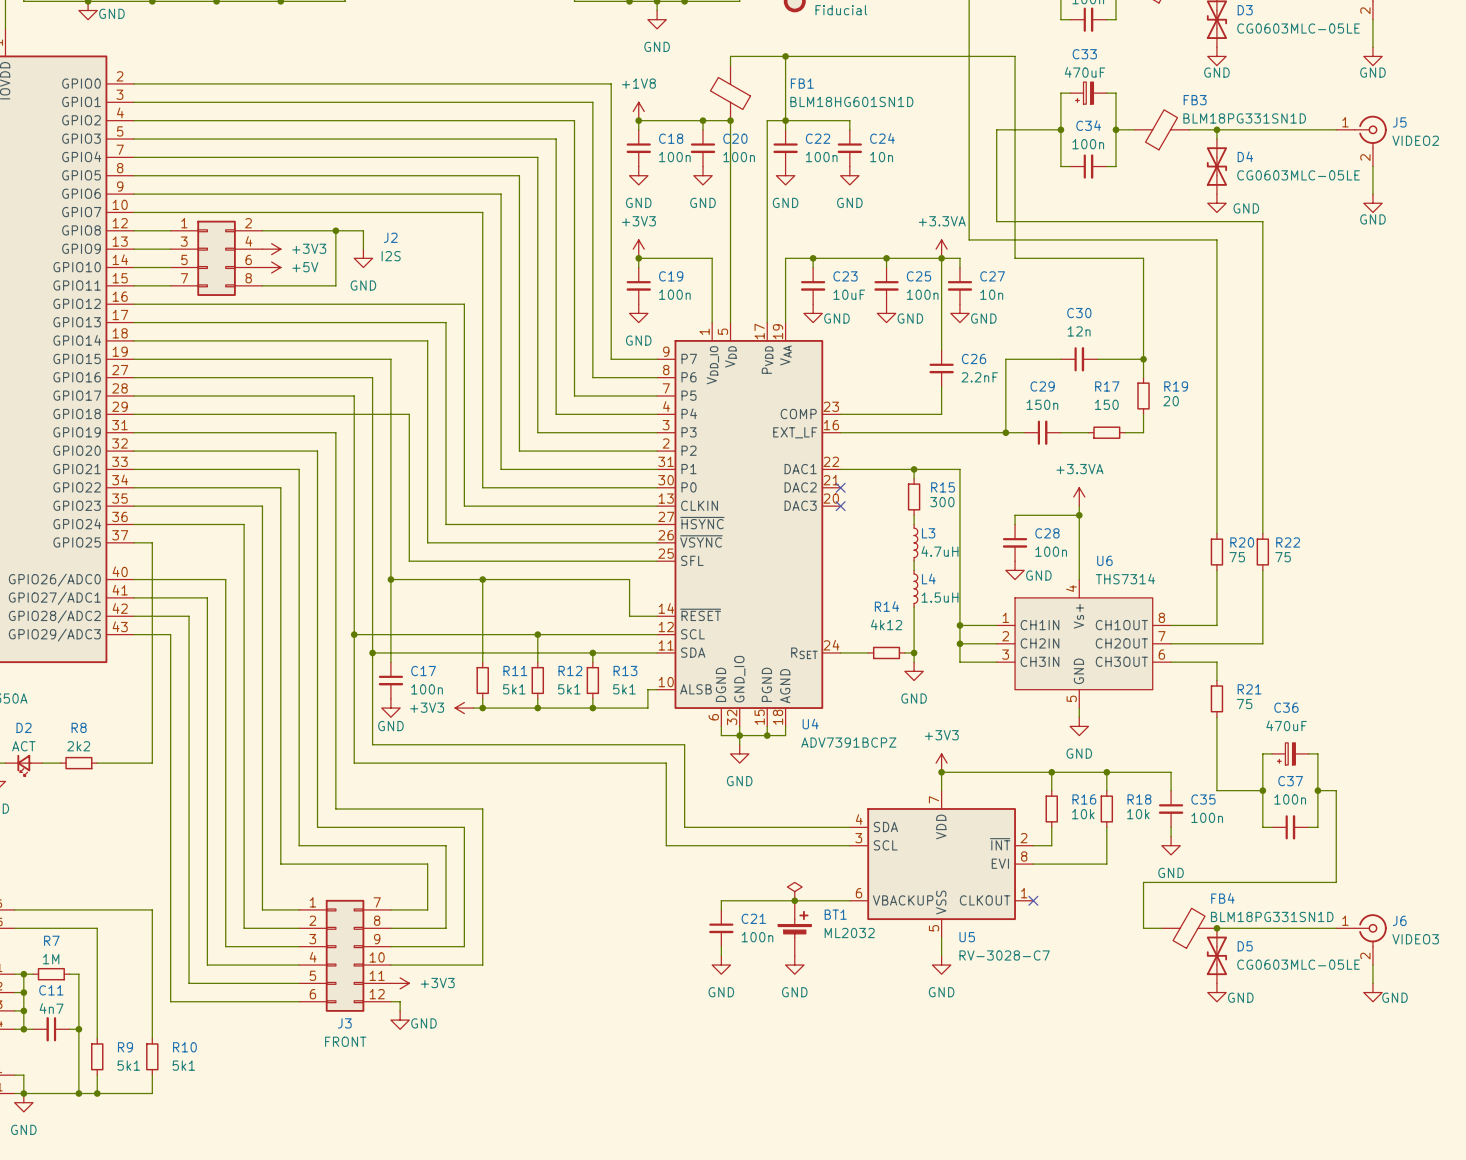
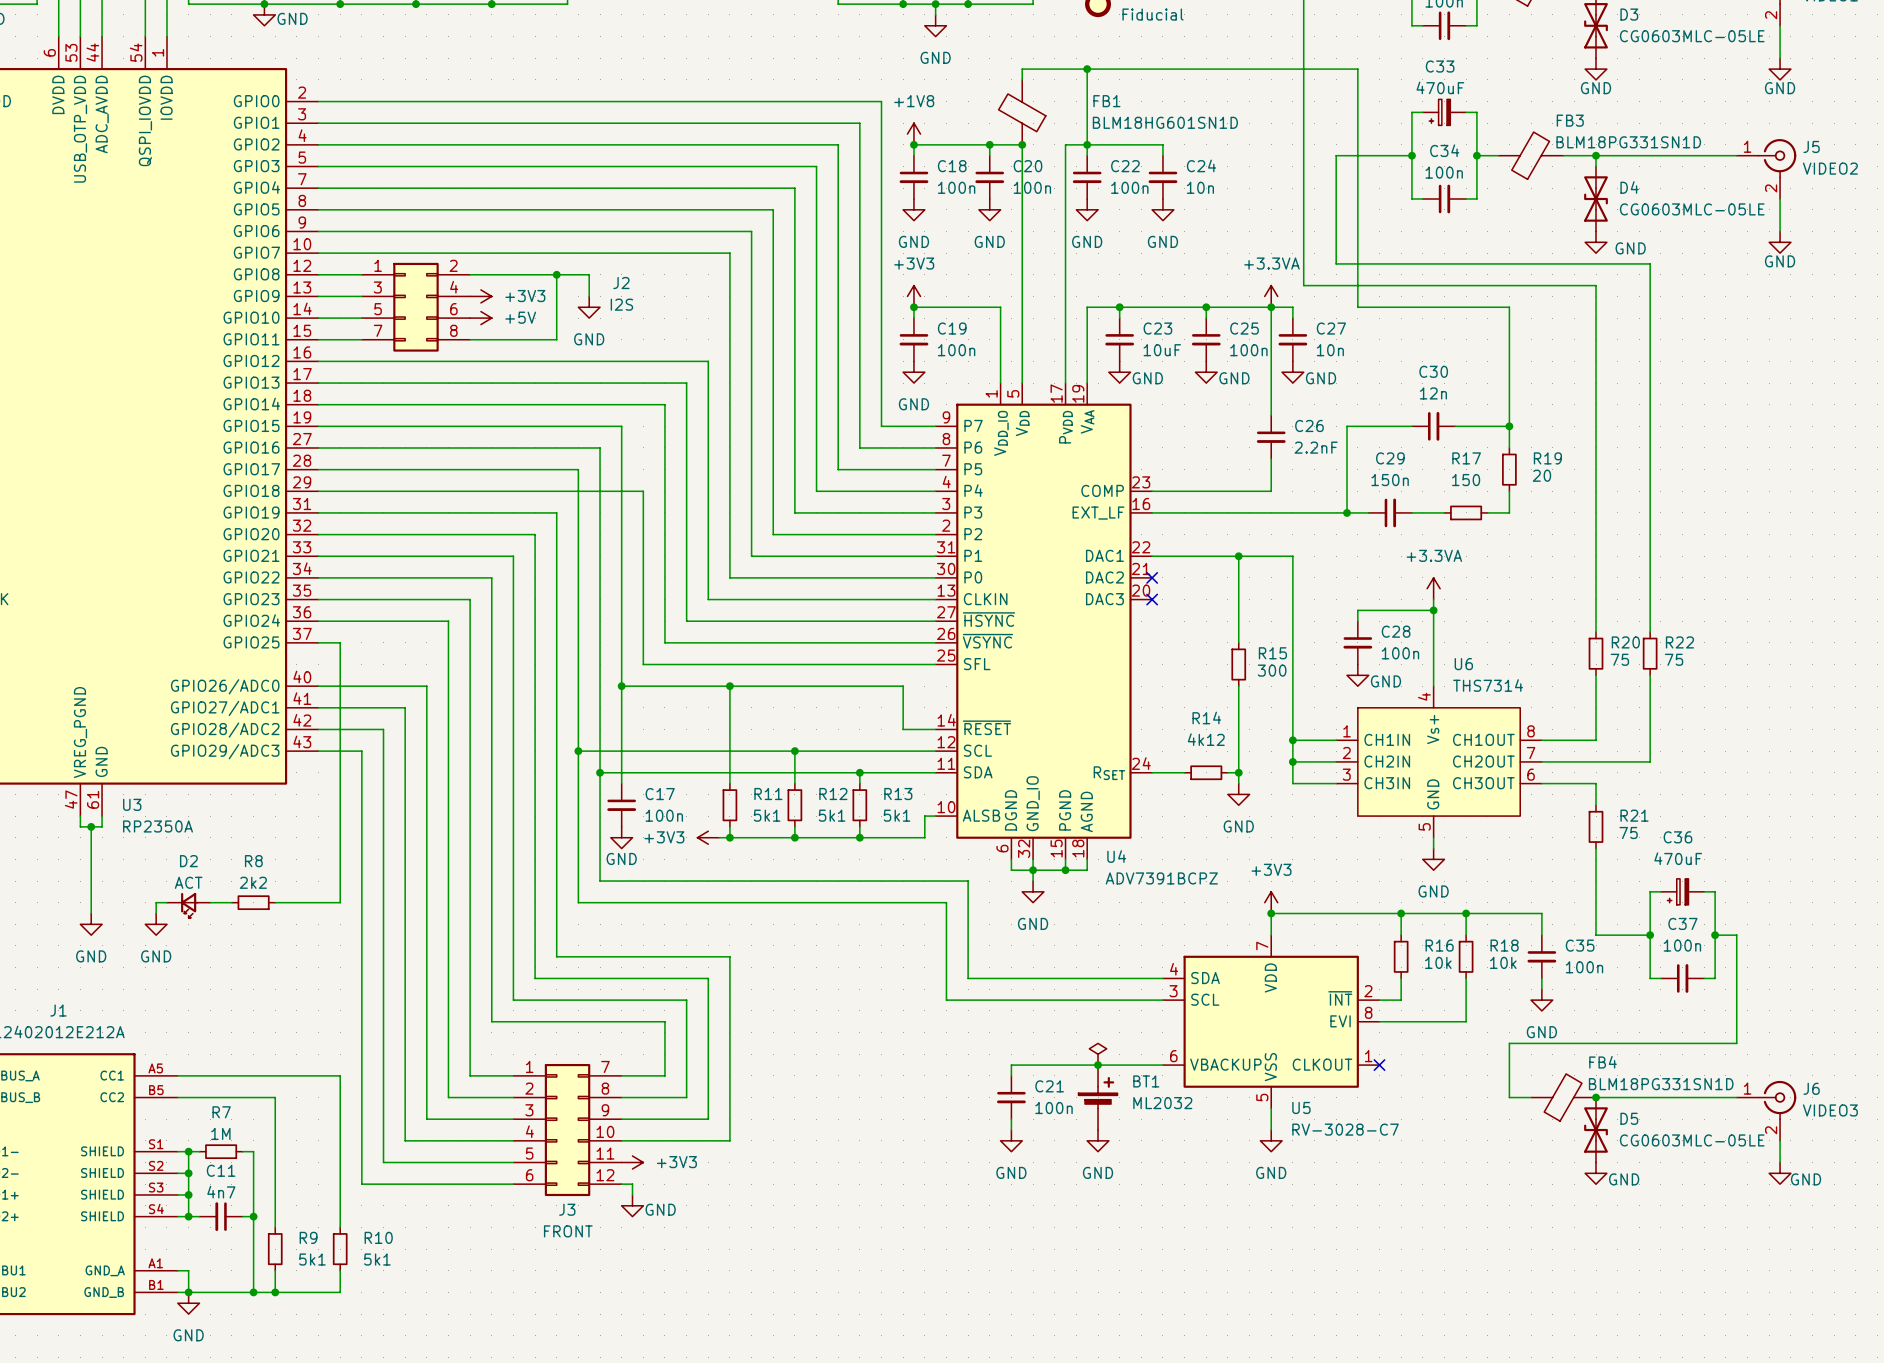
wire: none -> (1238, 567) (1238, 610)
R15 position: (914, 496) -> (1238, 664)
wire: none -> (1238, 621) (1238, 642)
L3: 4.7uH (915, 542) -> none
wire: (914, 561) (914, 570) -> none
wire: none -> (1238, 686) (1238, 718)
L4: 1.5uH (915, 588) -> none

